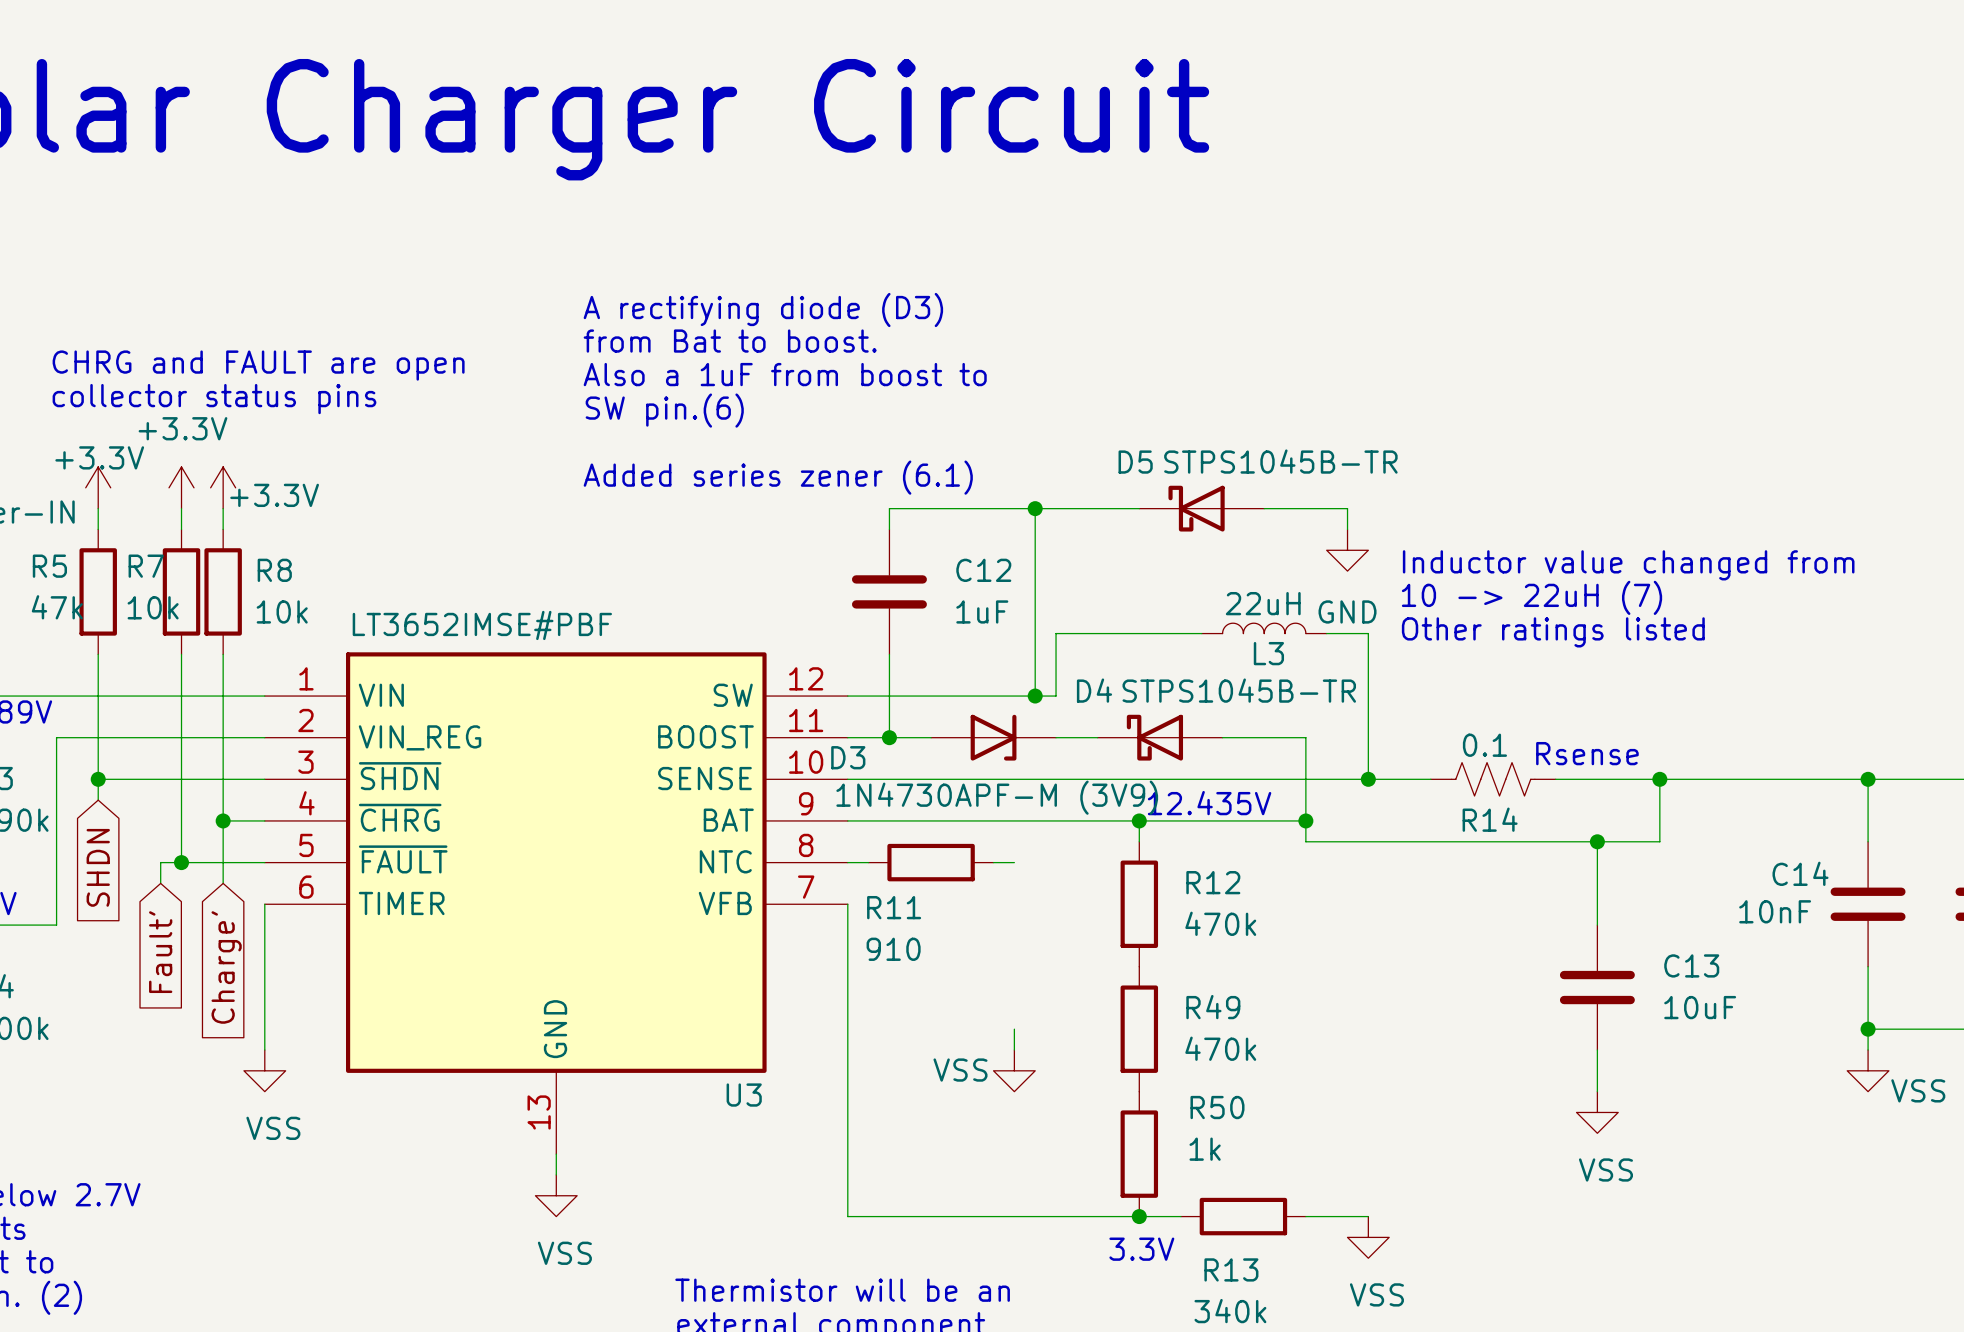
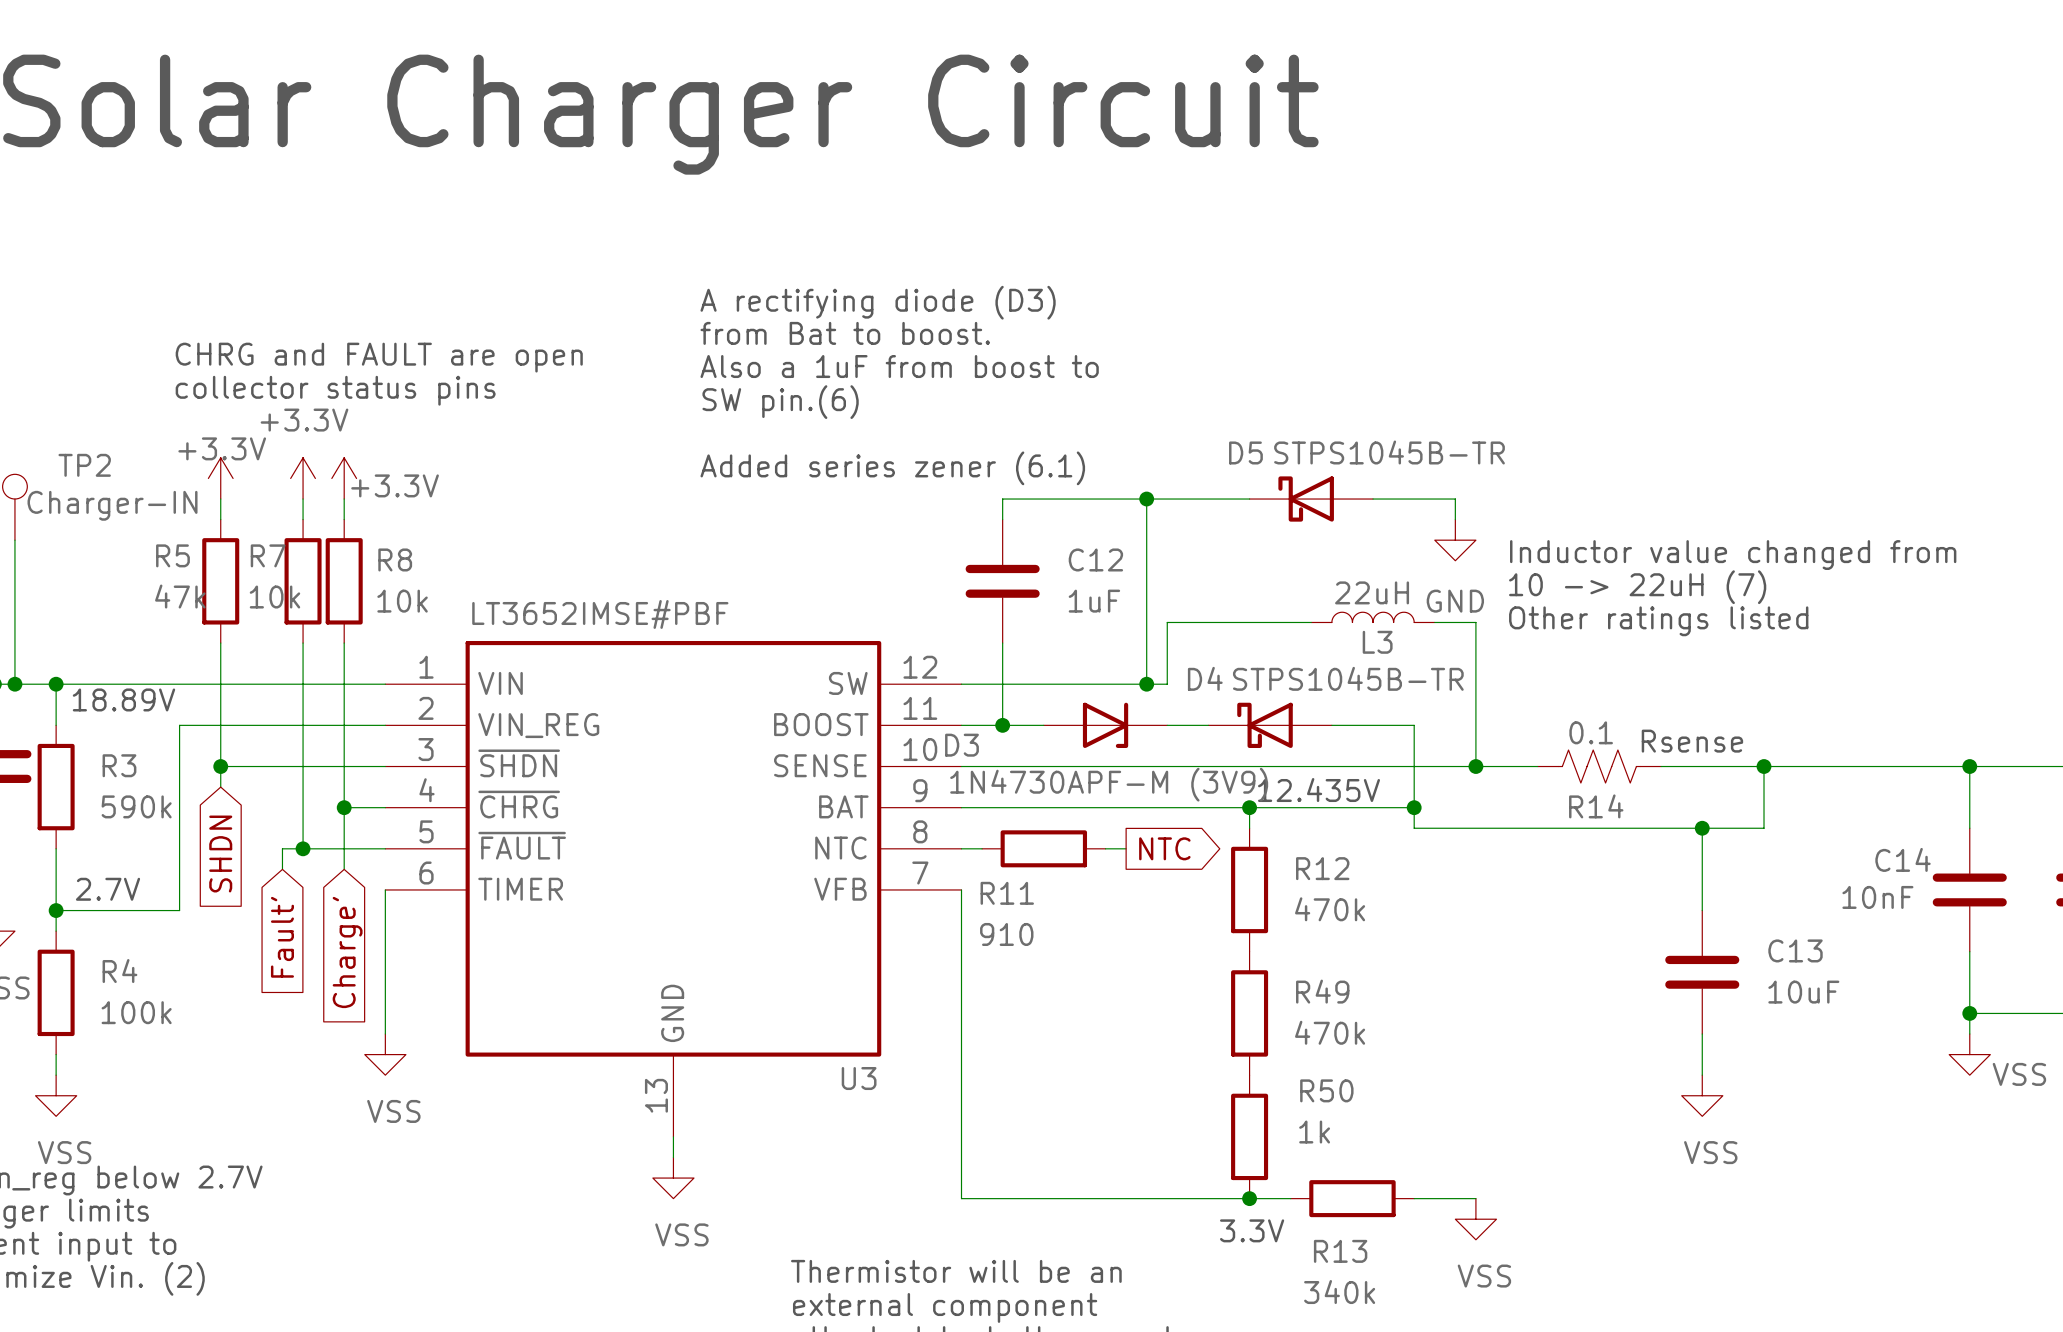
global label: none -> NTC (1164, 848)
wire: (1014, 1029) (1014, 1050) -> none
power symbol: VSS (1014, 1070) -> none

